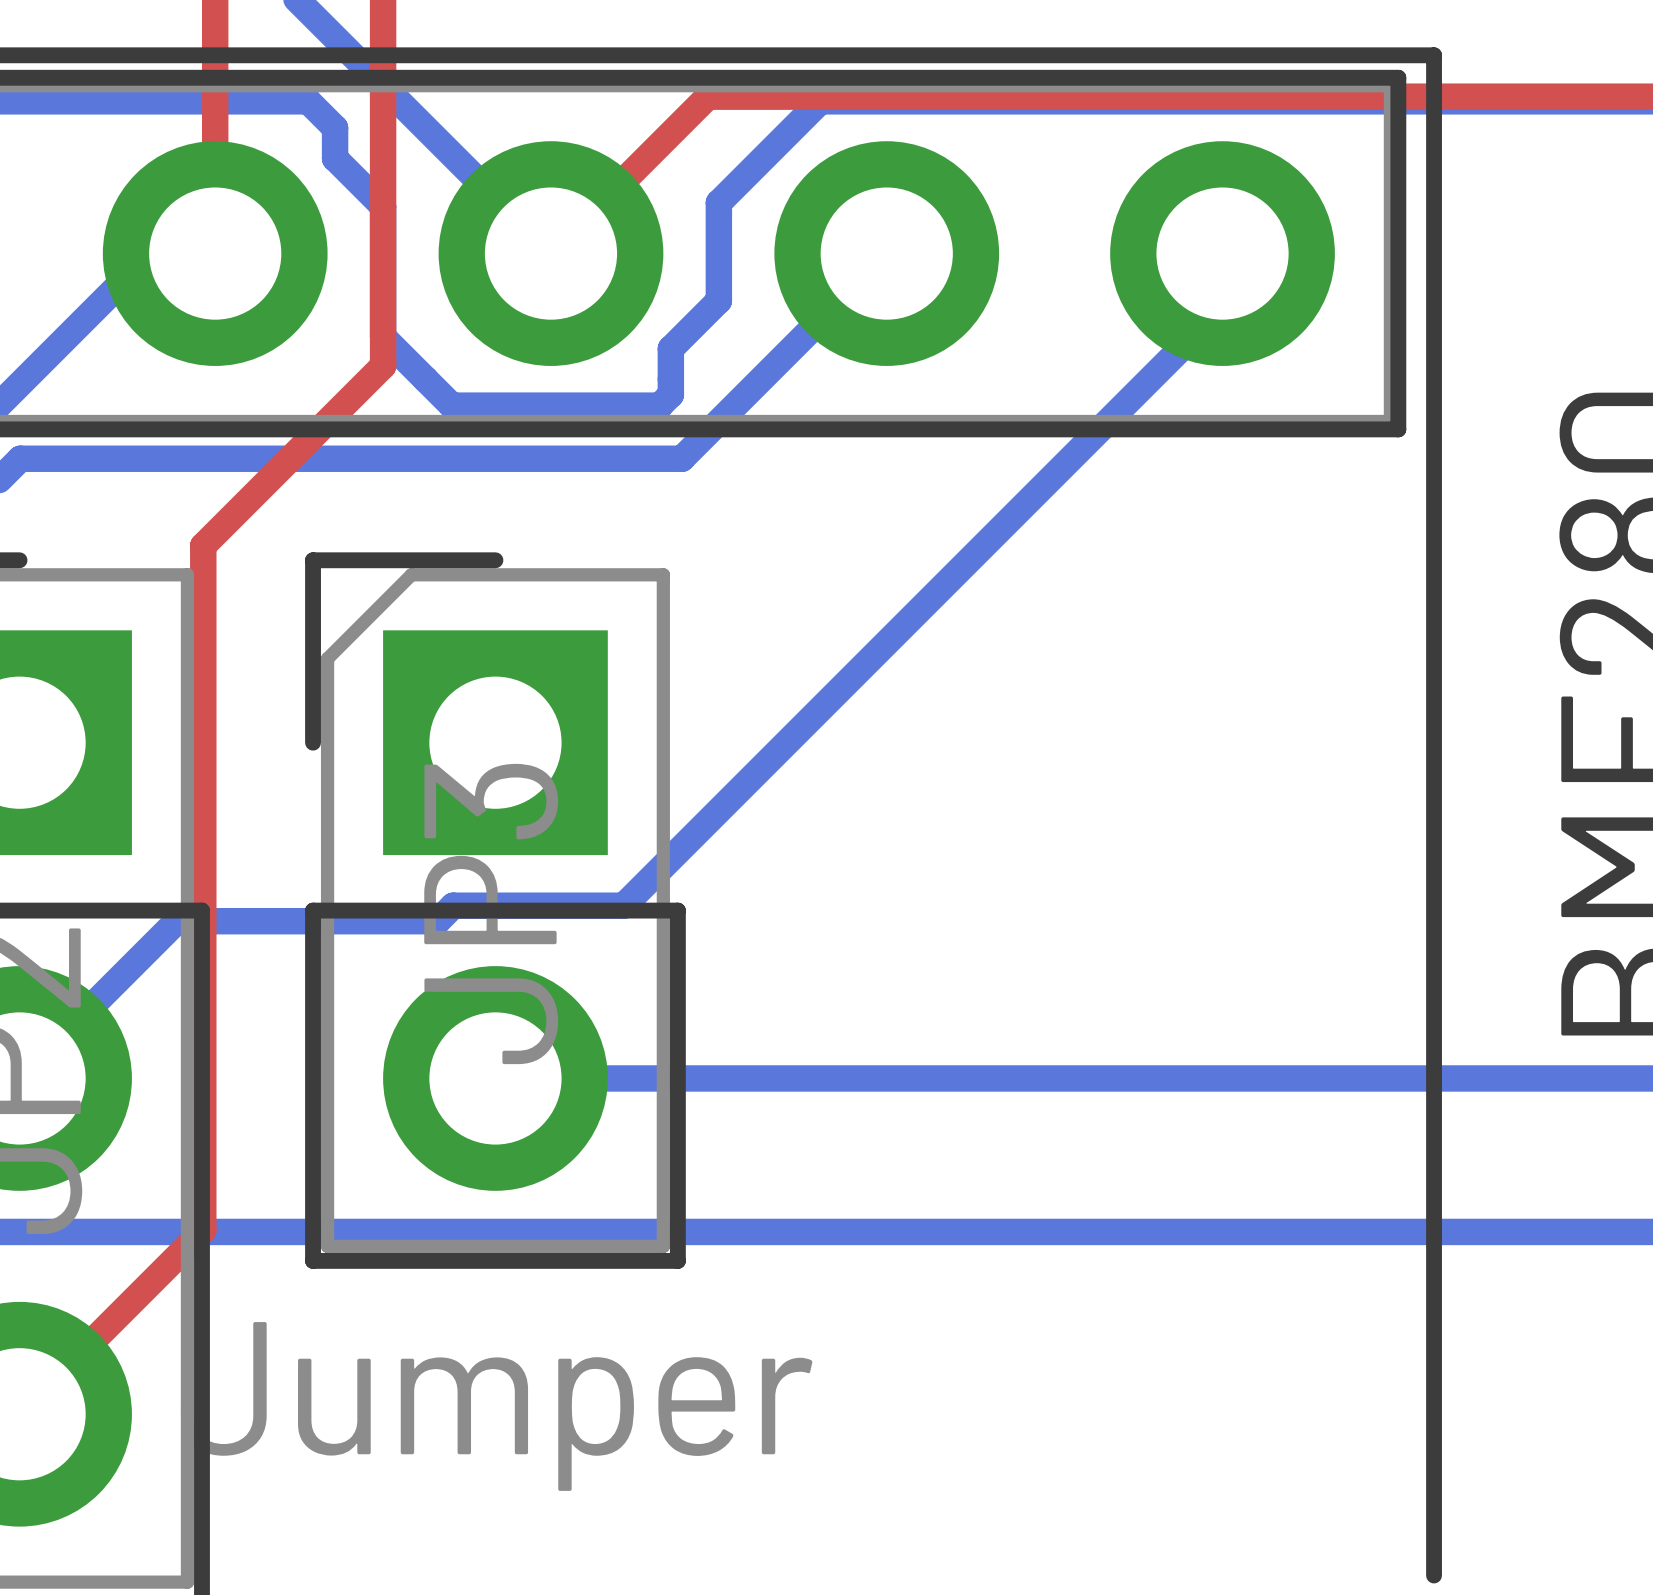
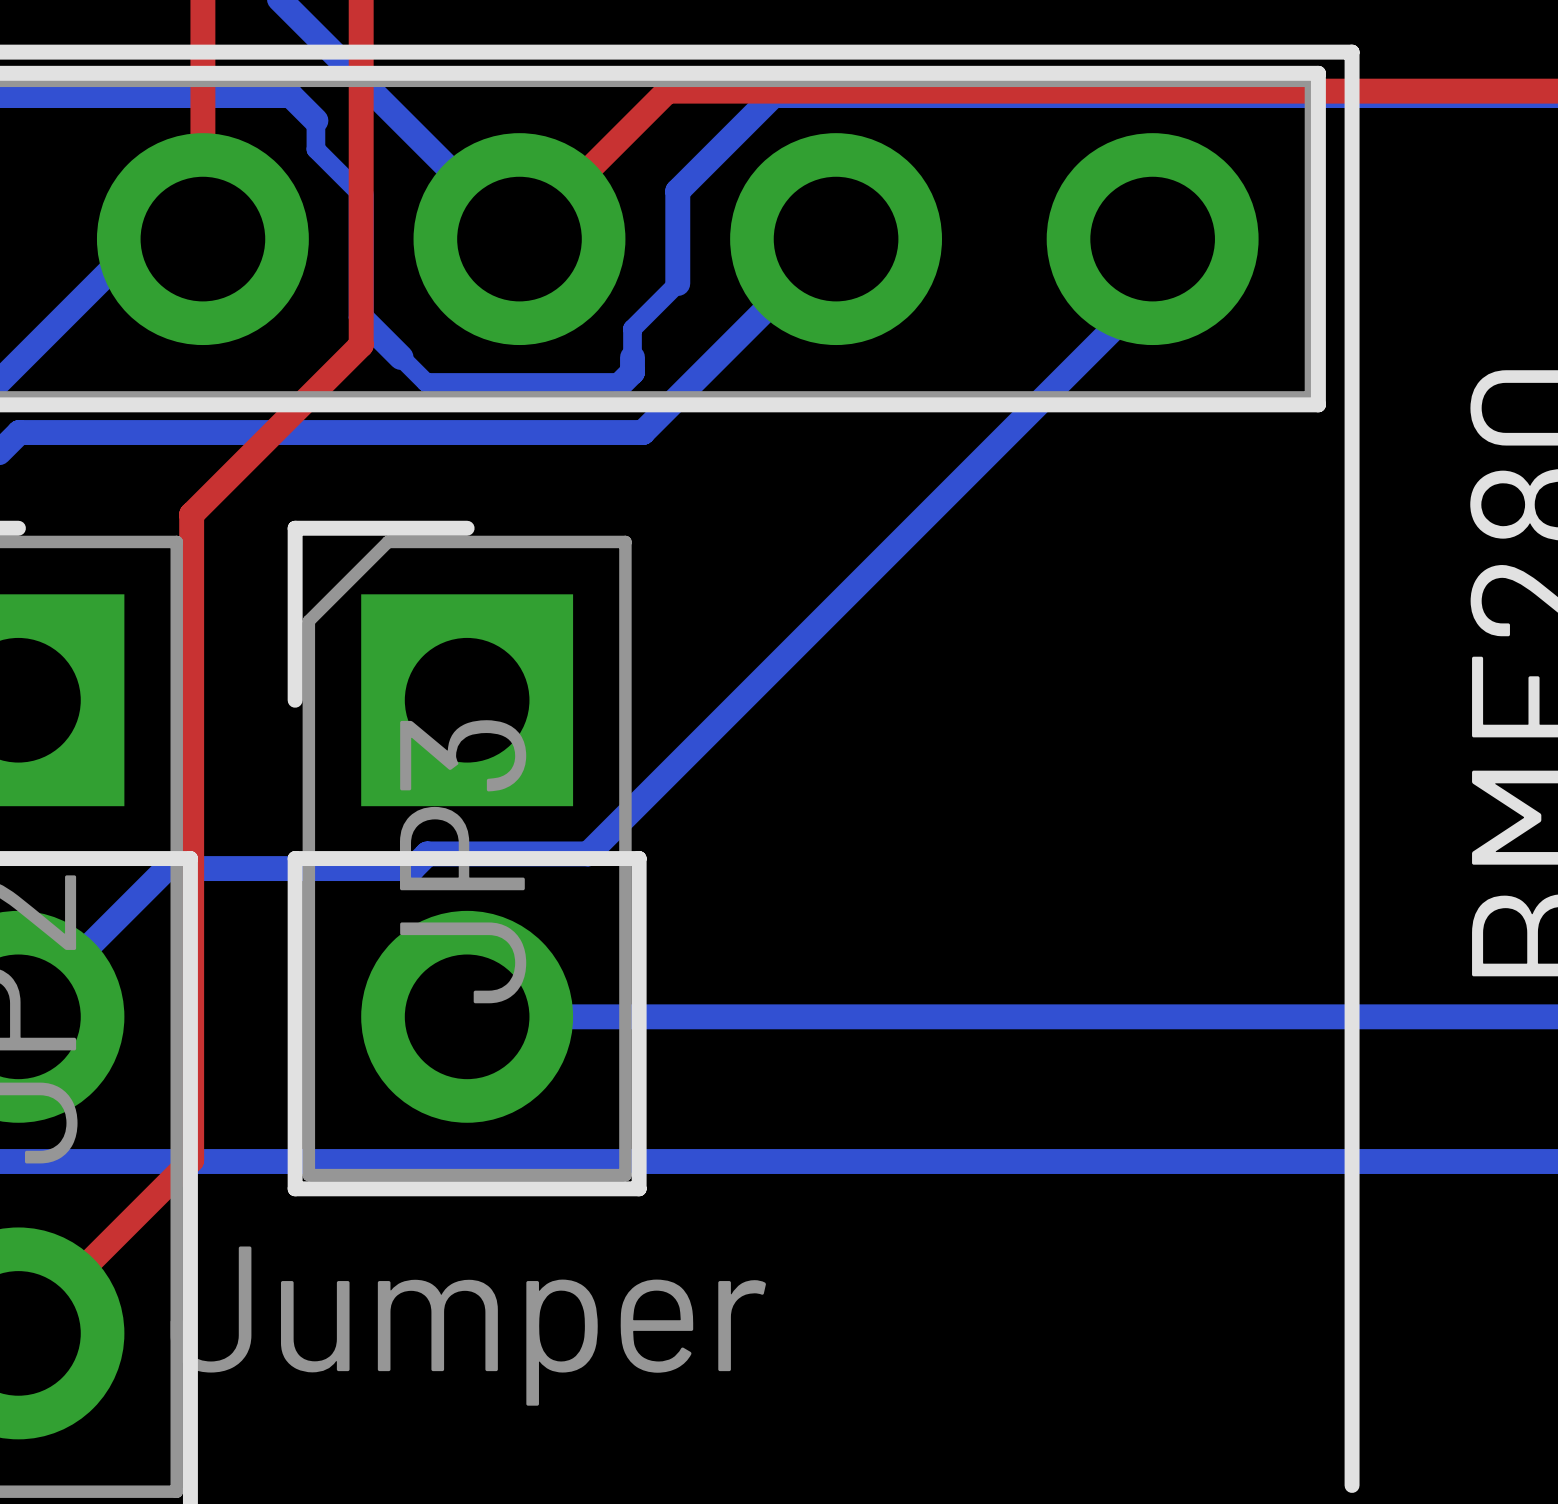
bottom track width: thick (335, 128) (335, 158) (383, 206) -> thin (315, 120) (315, 149) (361, 194)
bottom track width: thick (718, 300) (670, 348) (670, 379) -> thin (677, 283) (632, 328) (632, 357)
bottom track width: thick (425, 379) (451, 405) (659, 405) -> thin (401, 357) (426, 382) (622, 382)

